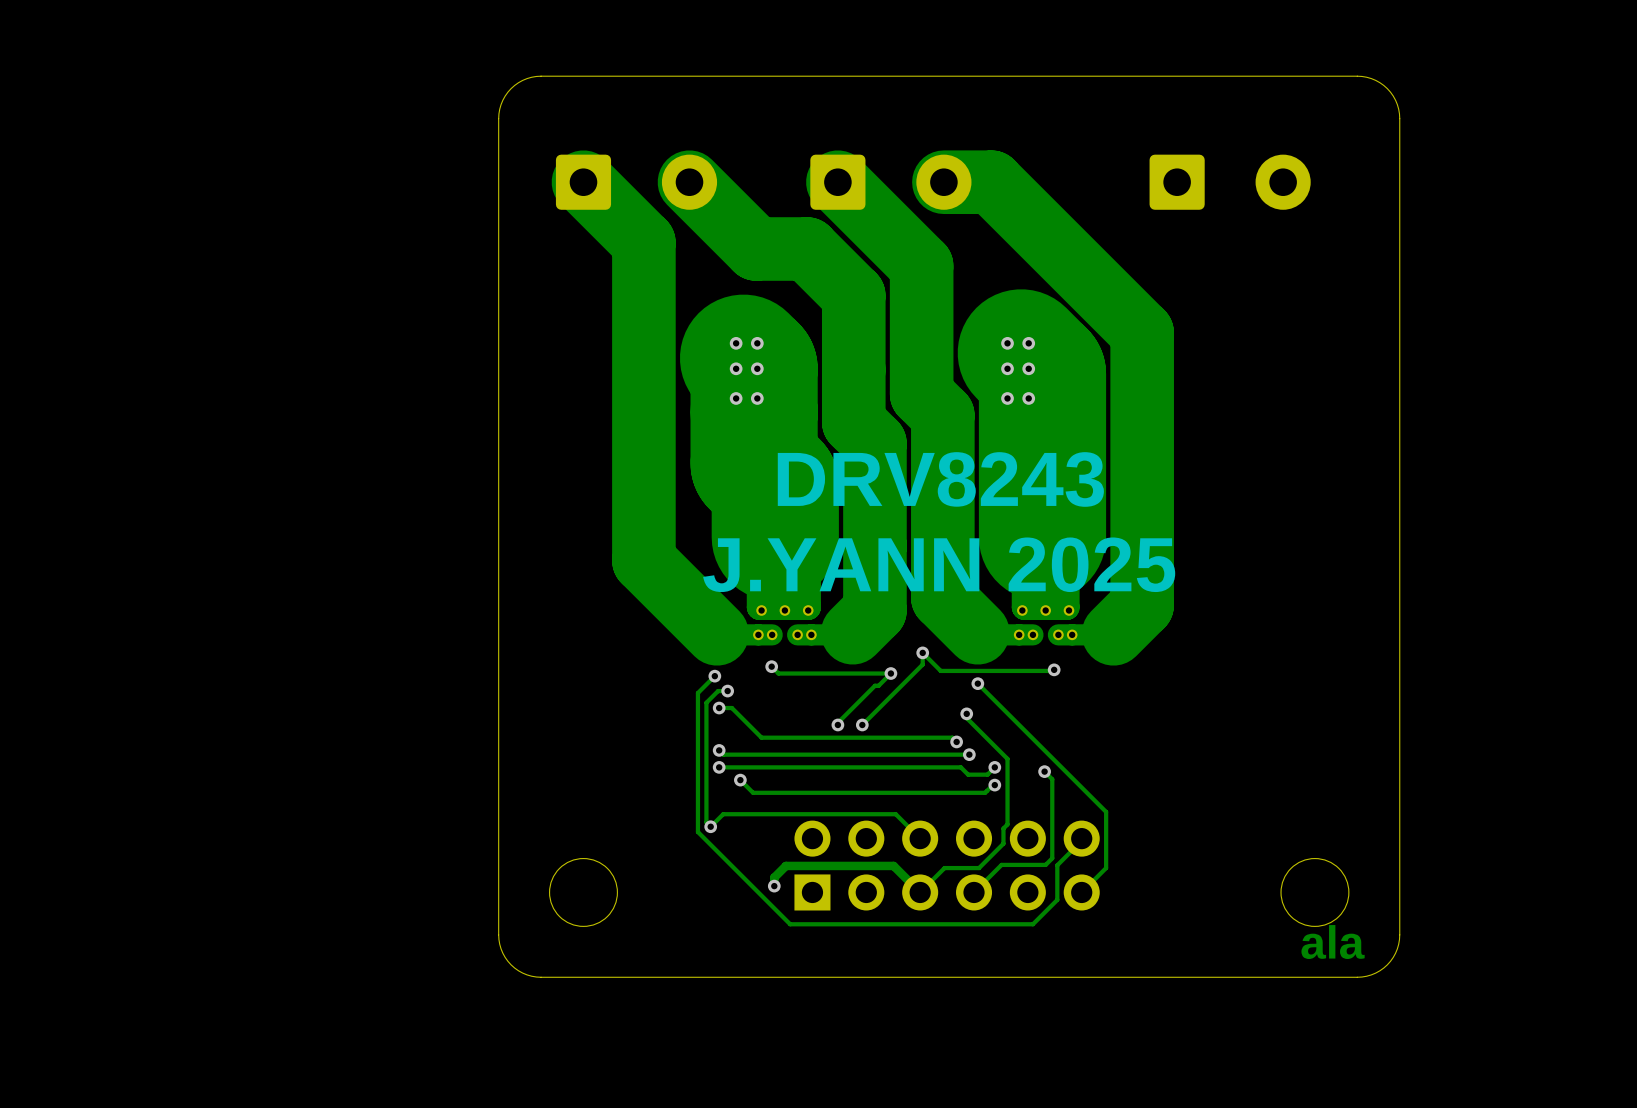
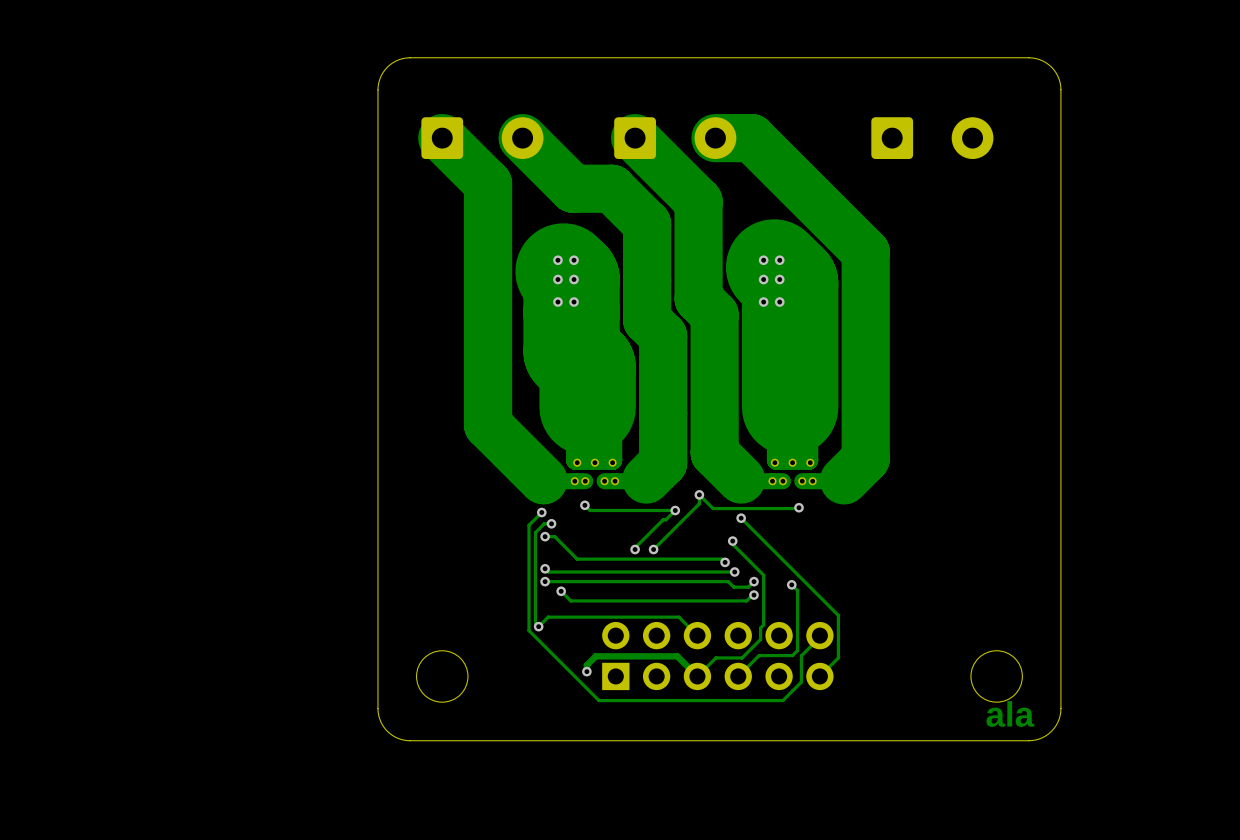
text: DRV8243 (940, 479) -> none
text: J.YANN 2025 (939, 564) -> none

